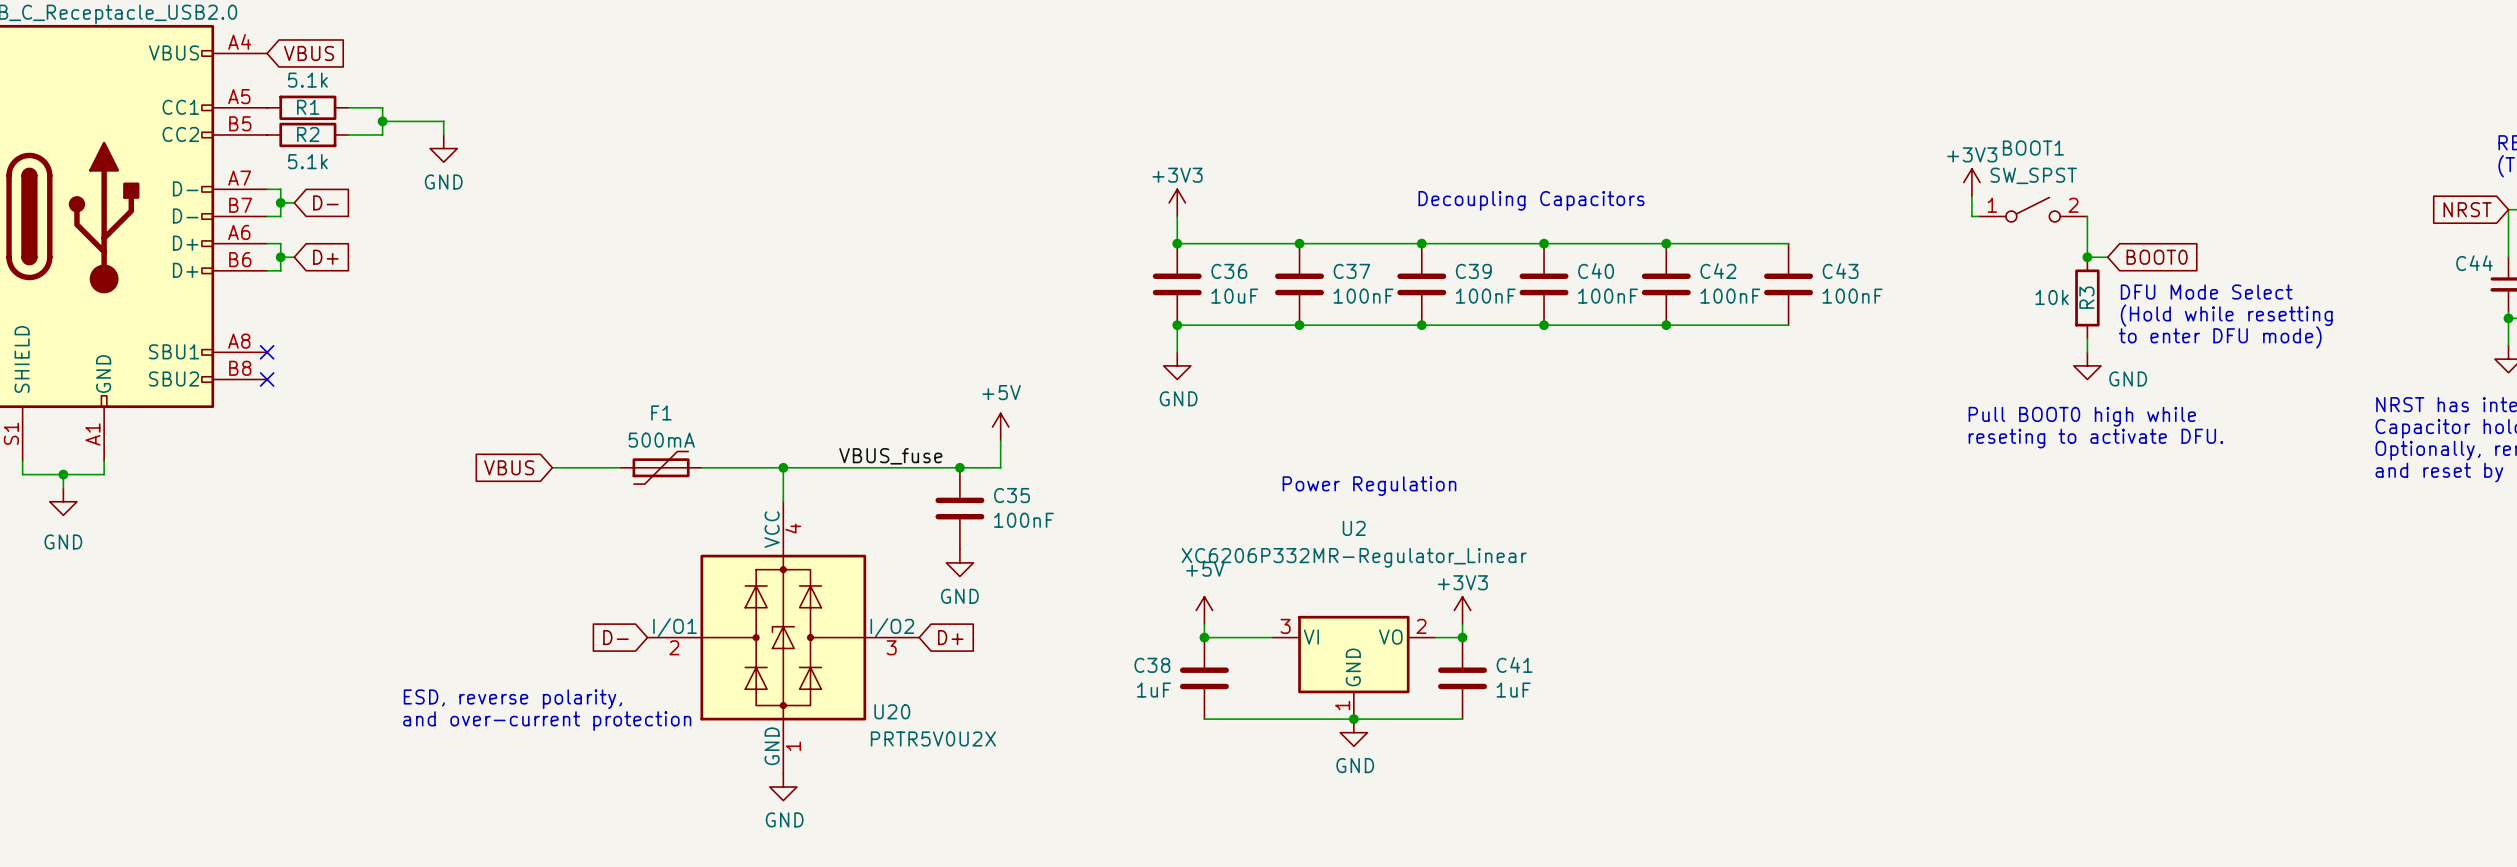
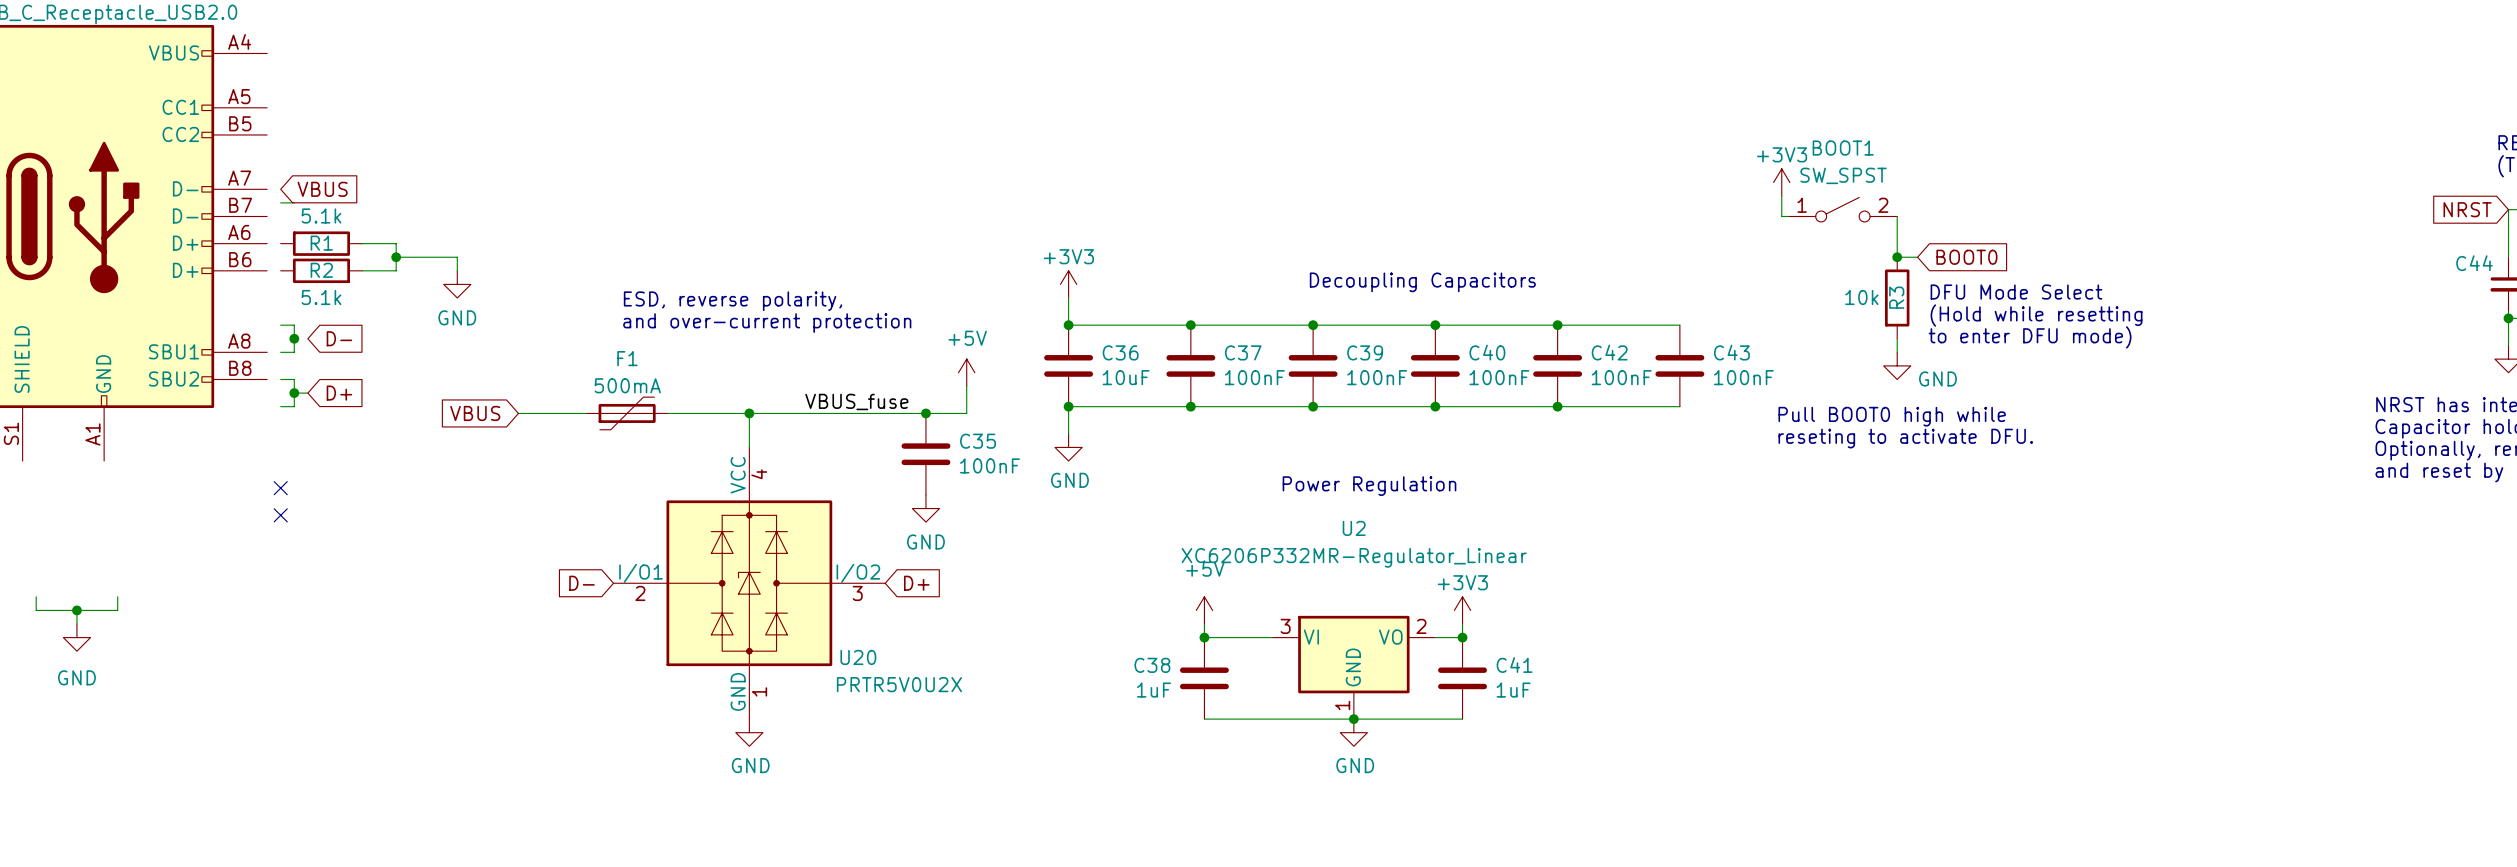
global label position: VBUS (309, 53) -> VBUS (322, 189)
R1 position: (307, 107) -> (321, 243)
wire: (348, 107) (382, 107) (382, 134) (348, 134) -> (362, 243) (396, 243) (396, 270) (362, 270)
wire: (382, 121) (443, 121) (443, 134) -> (396, 257) (457, 257) (457, 270)
junction: (382, 121) -> none
R2 position: (307, 134) -> (321, 270)
power symbol position: GND (443, 148) -> GND (457, 284)
power symbol position: +3V3 (1971, 182) -> +3V3 (1781, 182)
wire: (267, 189) (280, 189) (280, 216) (267, 216) -> (280, 325) (294, 325) (294, 352) (280, 352)
wire: (1971, 196) (1971, 216) (1978, 216) -> (1781, 196) (1781, 216) (1788, 216)
text position: Decoupling Capacitors (1531, 200) -> Decoupling Capacitors (1422, 282)
junction: (280, 202) -> none
global label position: D- (325, 202) -> D- (339, 338)
power symbol position: +3V3 (1177, 202) -> +3V3 (1068, 284)
BOOT1 position: (2033, 209) -> (1842, 209)
wire: (1177, 216) (1177, 243) (1788, 243) -> none
wire: (2087, 216) (2087, 257) (2107, 257) -> (1897, 216) (1897, 257) (1917, 257)
wire: (267, 243) (280, 243) (280, 270) (267, 270) -> (280, 379) (294, 379) (294, 406) (280, 406)
junction: (1177, 243) -> none
junction: (1299, 243) -> none
junction: (1421, 243) -> none
junction: (1544, 243) -> none
junction: (1666, 243) -> none
wire: (280, 257) (294, 257) -> (294, 393) (307, 393)
junction: (280, 257) -> none
global label position: D+ (325, 257) -> D+ (339, 393)
junction: none -> (396, 257)
junction: none -> (1897, 257)
junction: (2087, 257) -> none
global label position: BOOT0 (2157, 257) -> BOOT0 (1966, 257)
C36 position: (1177, 284) -> (1068, 365)
C37 position: (1299, 284) -> (1190, 365)
C39 position: (1421, 284) -> (1313, 365)
C40 position: (1544, 284) -> (1435, 365)
C42 position: (1666, 284) -> (1557, 365)
C43 position: (1788, 284) -> (1679, 365)
text position: DFU Mode Select (2206, 292) -> DFU Mode Select (2016, 292)
R3 position: (2087, 297) -> (1897, 297)
text: none -> ESD, reverse polarity, (732, 301)
text position: (Hold while resetting (2226, 315) -> (Hold while resetting (2036, 315)
text: none -> and over-current protection (767, 323)
junction: none -> (1068, 325)
wire: (1177, 325) (1177, 352) -> (1177, 325) (1068, 325) (1068, 297)
junction position: (1177, 325) -> (1190, 325)
junction position: (1299, 325) -> (1313, 325)
junction position: (1421, 325) -> (1435, 325)
junction position: (1544, 325) -> (1557, 325)
junction: (1666, 325) -> none
wire: (1679, 325) (1788, 325) -> none
text position: to enter DFU mode) (2220, 337) -> to enter DFU mode) (2030, 337)
junction: none -> (294, 338)
wire: (2087, 338) (2087, 352) -> (1897, 338) (1897, 352)
no-connect mark: (267, 352) -> none
power symbol: GND (1177, 365) -> none
power symbol position: GND (2087, 365) -> GND (1897, 365)
no-connect mark: (267, 379) -> none
junction: none -> (294, 393)
junction: none -> (1068, 406)
junction: none -> (1190, 406)
junction: none -> (1313, 406)
junction: none -> (1435, 406)
junction: none -> (1557, 406)
wire: none -> (1679, 406) (1068, 406) (1068, 433)
junction: none -> (925, 413)
text position: Pull BOOT0 high while (2082, 416) -> Pull BOOT0 high while (1892, 416)
power symbol position: +5V (1000, 427) -> +5V (966, 372)
text position: reseting to activate DFU. (2095, 438) -> reseting to activate DFU. (1905, 438)
wire: (1000, 440) (1000, 467) (701, 467) -> (966, 386) (966, 413) (667, 413)
power symbol: none -> GND (1068, 447)
label position: VBUS_fuse (890, 456) -> VBUS_fuse (856, 401)
wire: (22, 461) (22, 474) (104, 474) (104, 461) -> (36, 596) (36, 610) (117, 610) (117, 596)
global label position: VBUS (509, 467) -> VBUS (475, 413)
wire: (552, 467) (620, 467) -> (518, 413) (586, 413)
F1 position: (661, 467) -> (627, 413)
wire: (783, 467) (783, 501) -> (749, 413) (749, 447)
junction position: (783, 467) -> (749, 413)
junction: (959, 467) -> none
wire: (63, 474) (63, 488) -> (76, 610) (76, 624)
junction: (63, 474) -> none
no-connect mark: none -> (280, 488)
power symbol position: GND (63, 501) -> GND (76, 637)
C35 position: (959, 508) -> (925, 454)
no-connect mark: none -> (280, 515)
power symbol position: GND (959, 562) -> GND (925, 508)
junction: none -> (76, 610)
global label position: D- (615, 637) -> D- (581, 583)
U20 position: (783, 637) -> (749, 583)
global label position: D+ (950, 637) -> D+ (916, 583)
text: ESD, reverse polarity, (512, 699) -> none
text: and over-current protection (547, 721) -> none
power symbol position: GND (783, 787) -> GND (749, 732)

